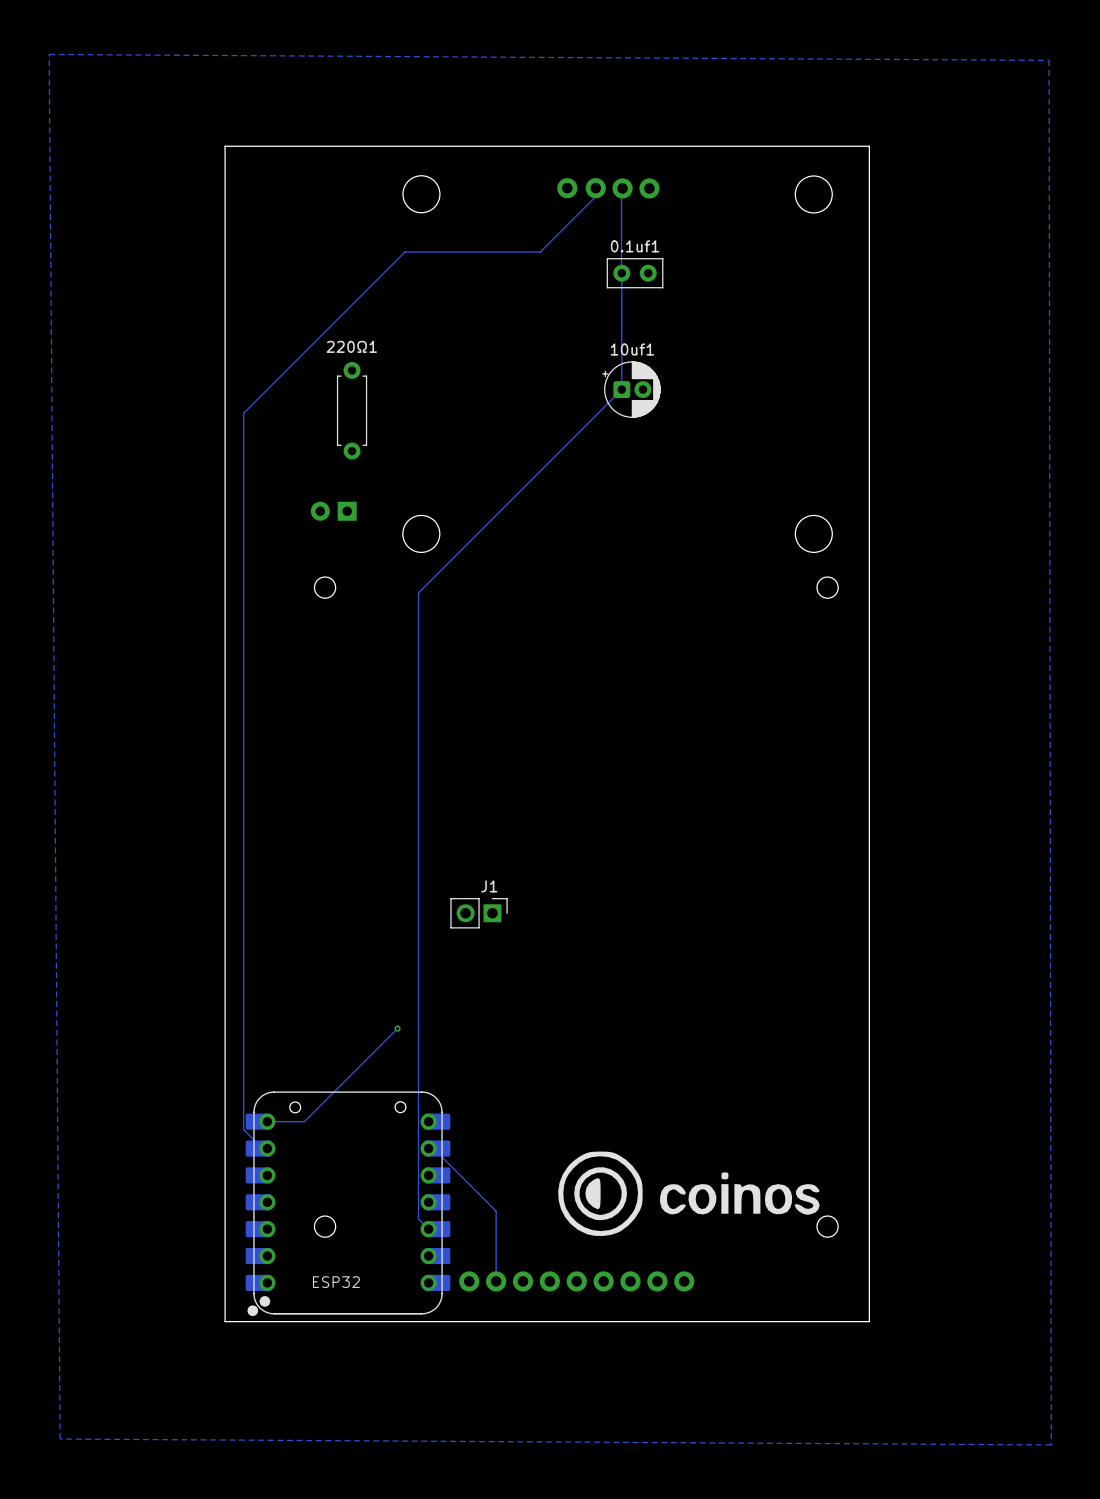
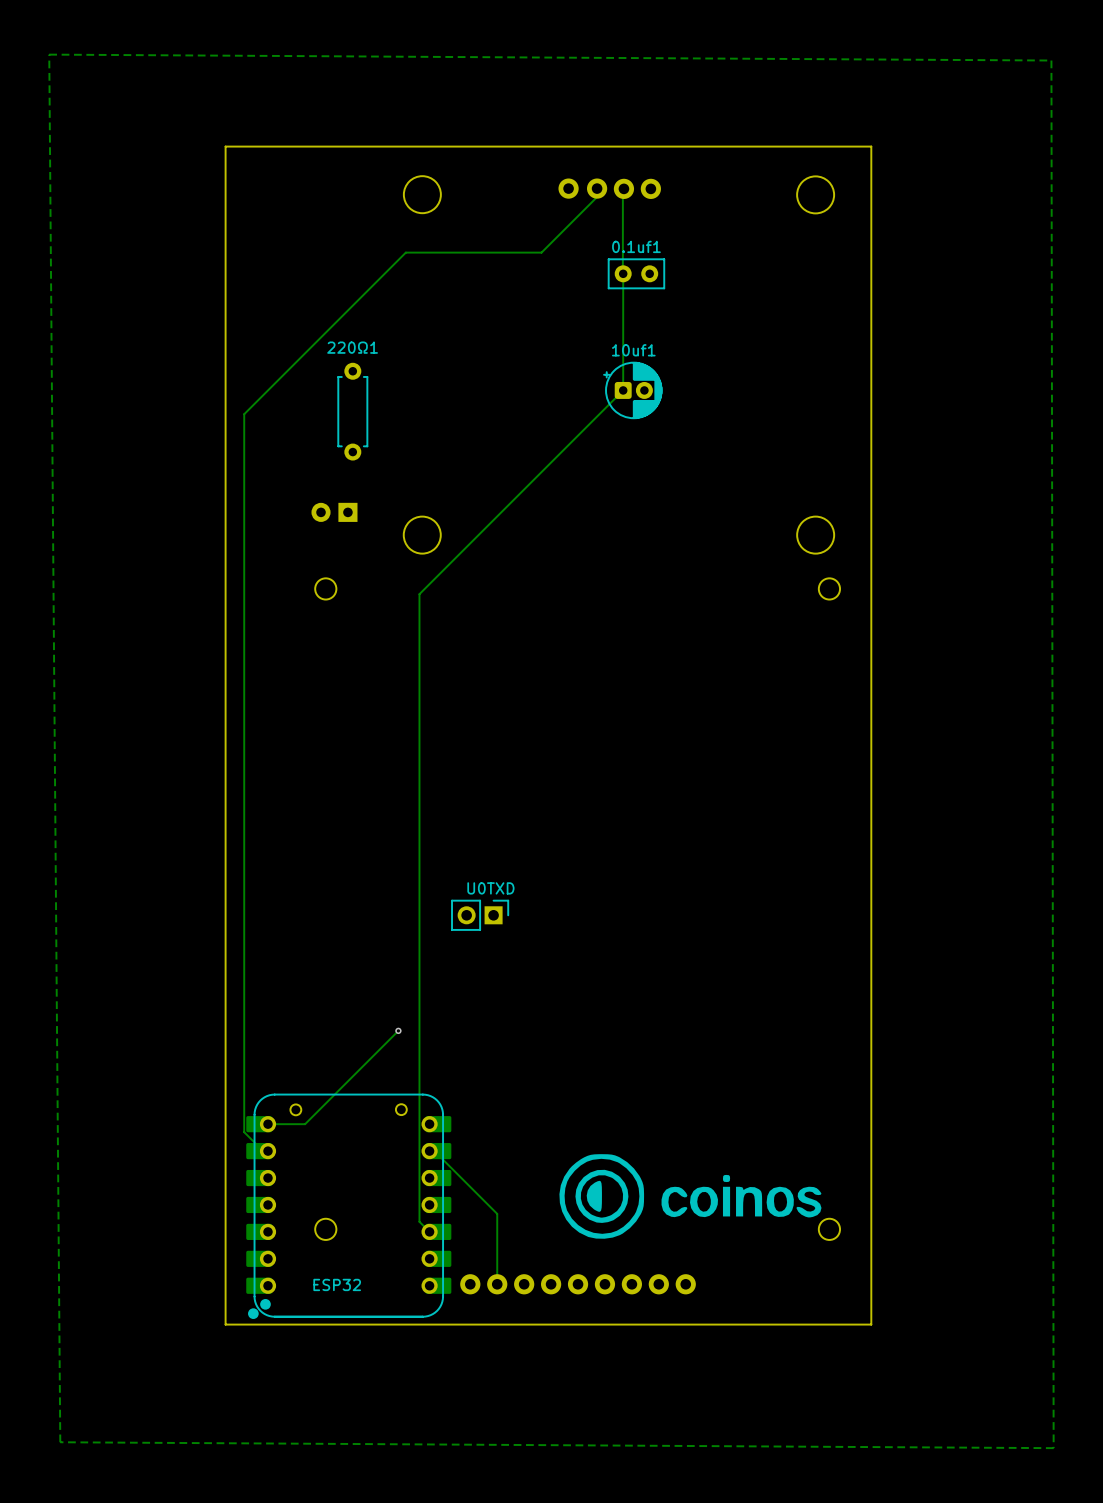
J1 name: J1 (489, 886) -> U0TXD (490, 888)

